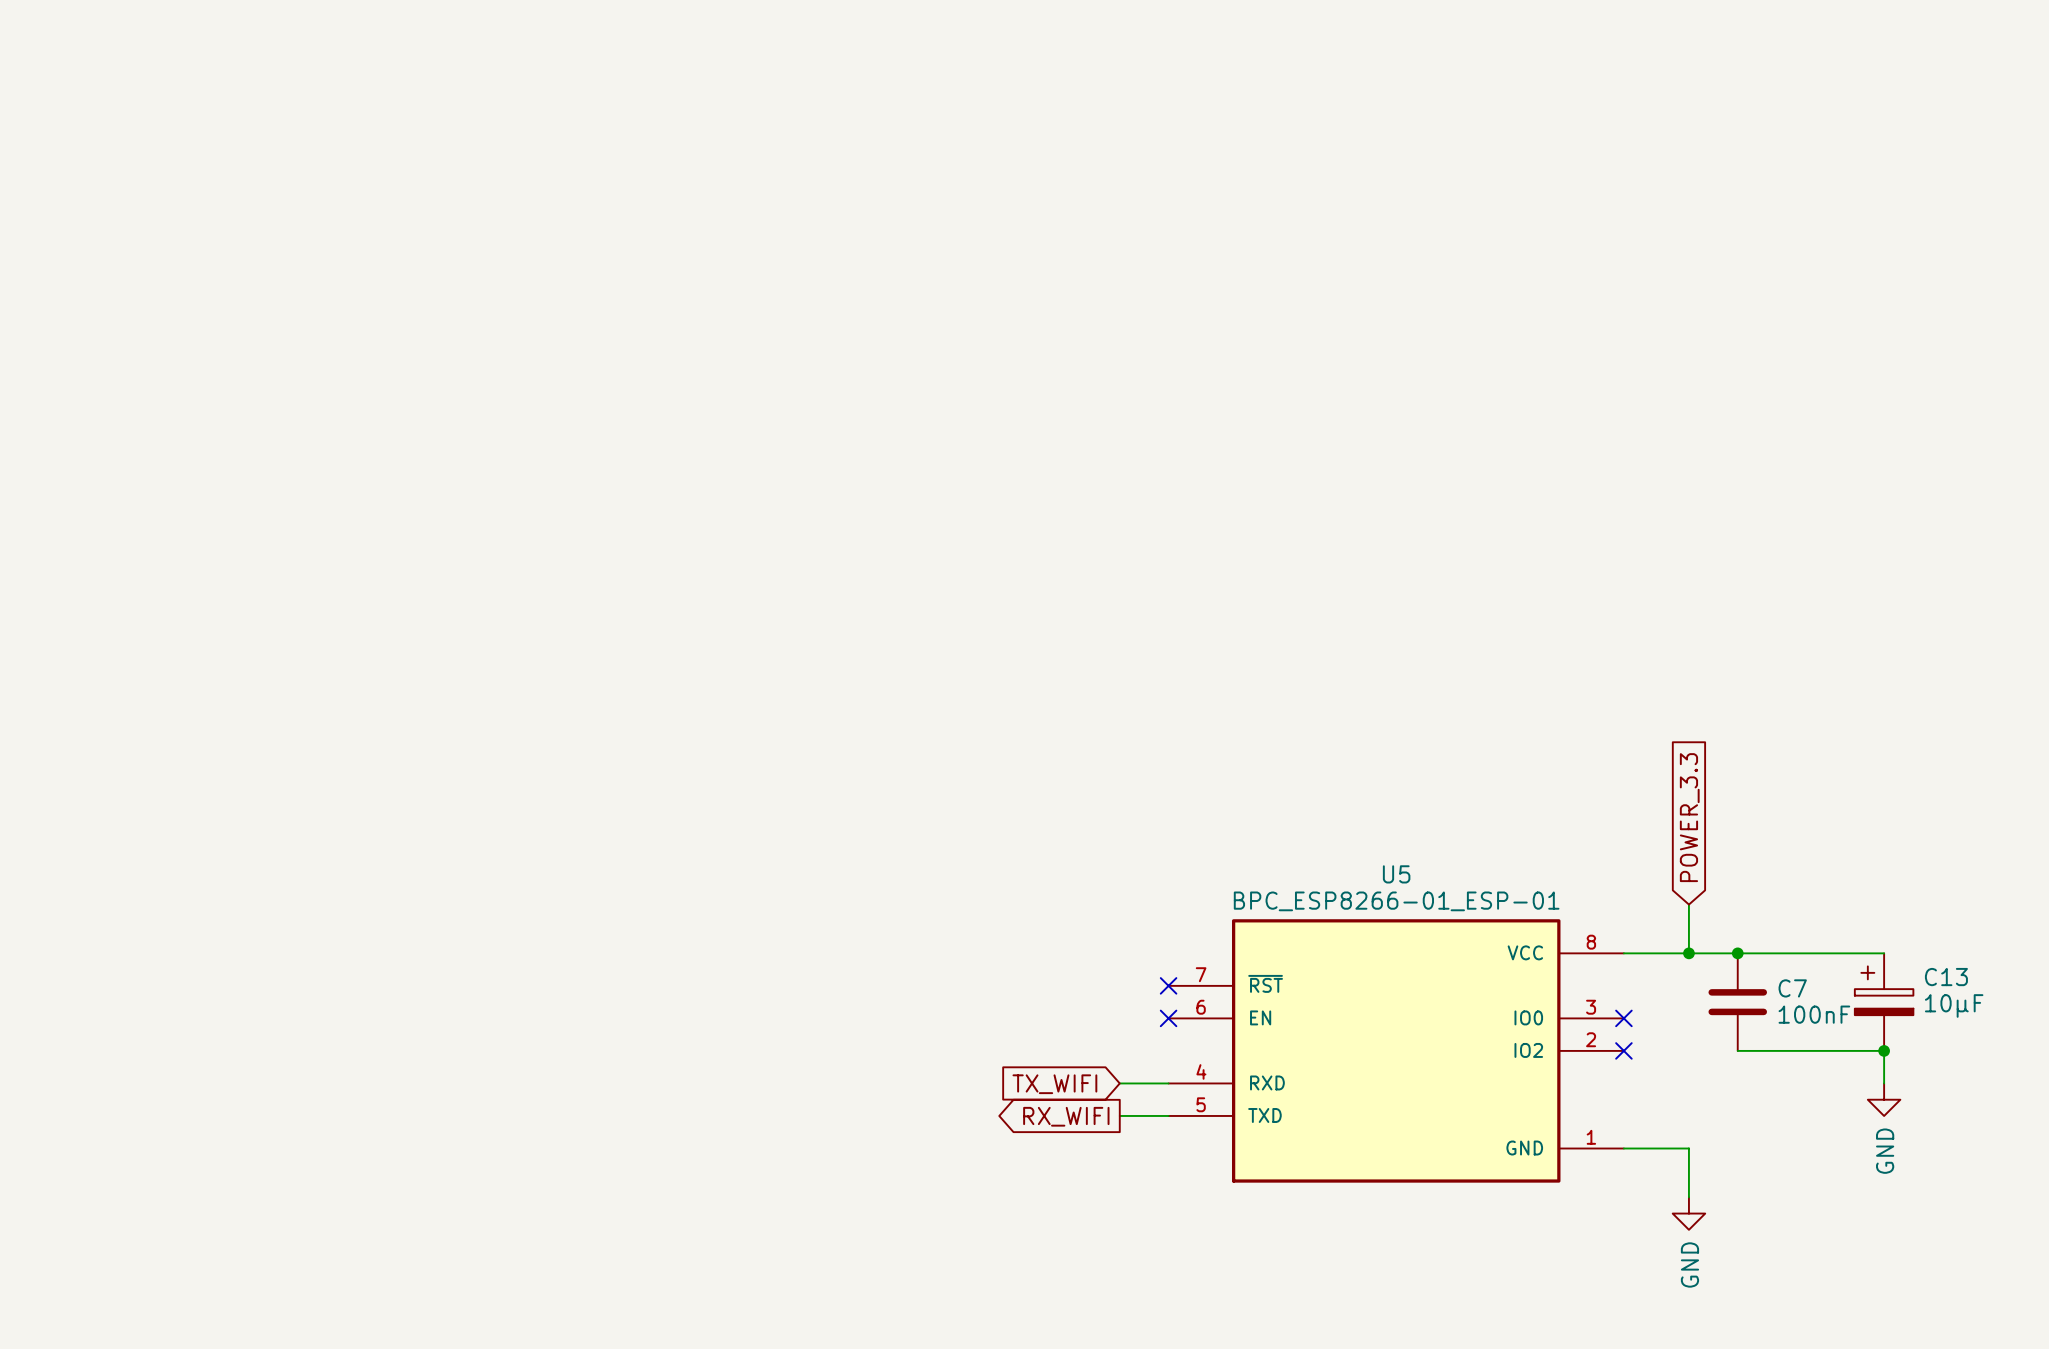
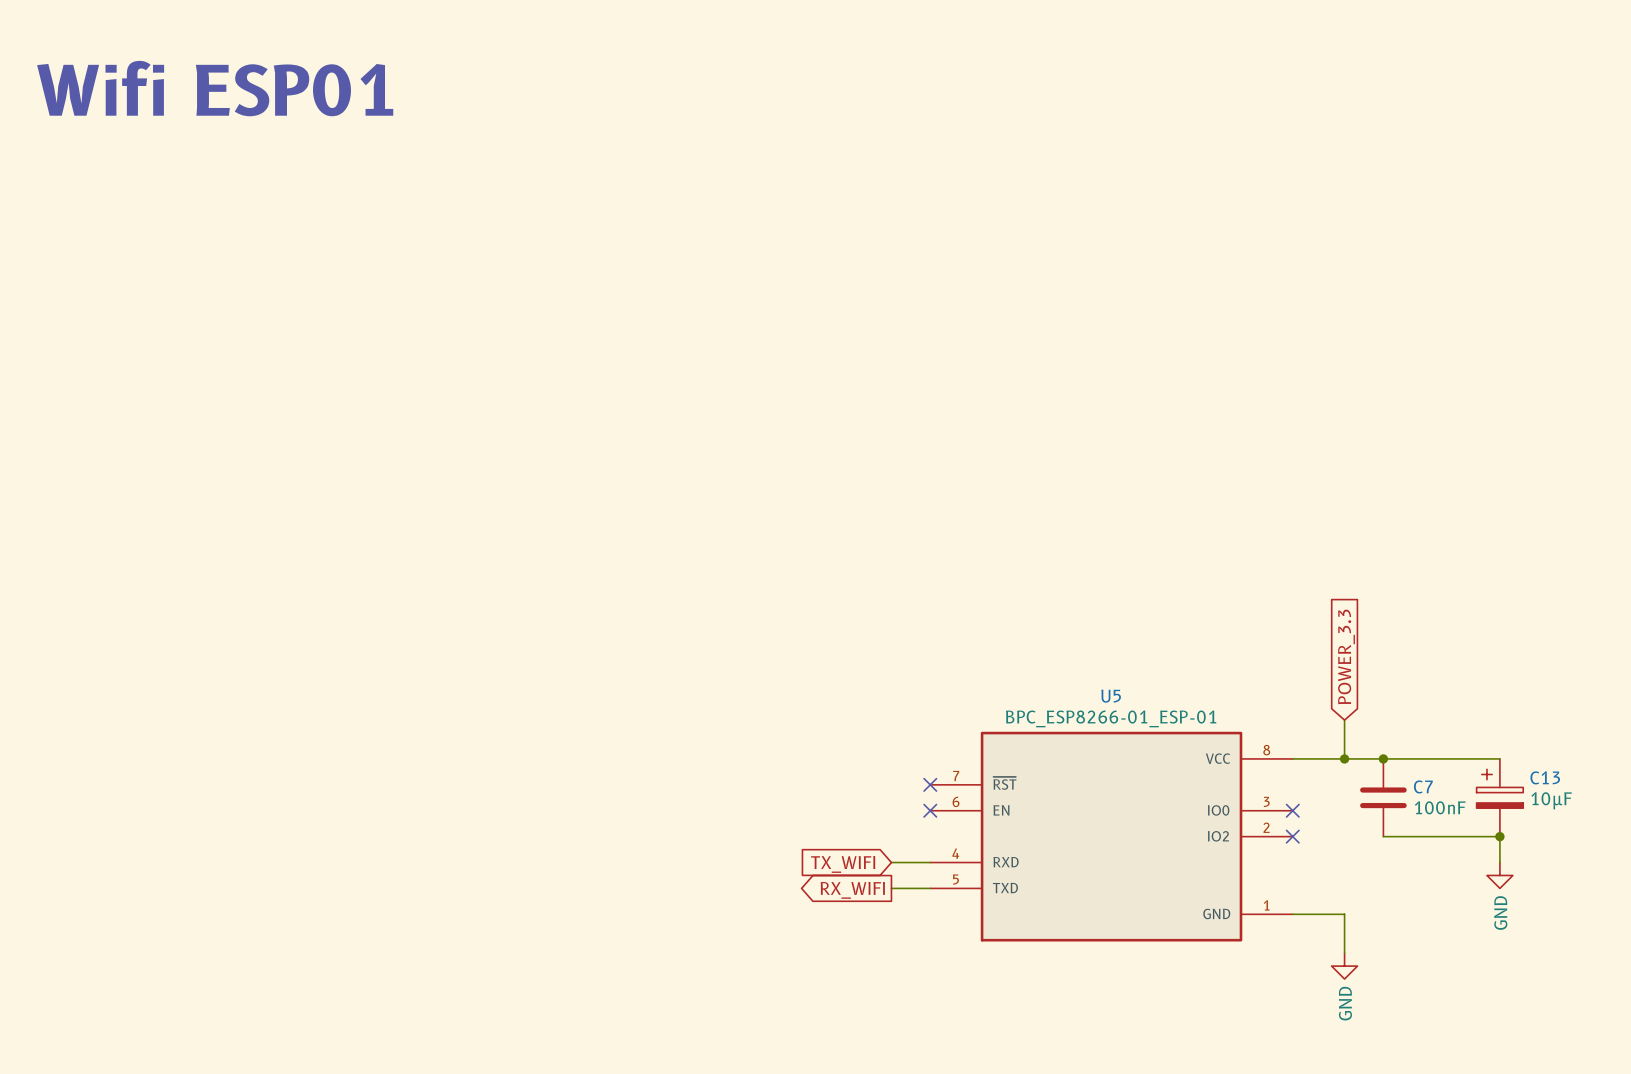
text: none -> Wifi ESP01 (215, 88)

